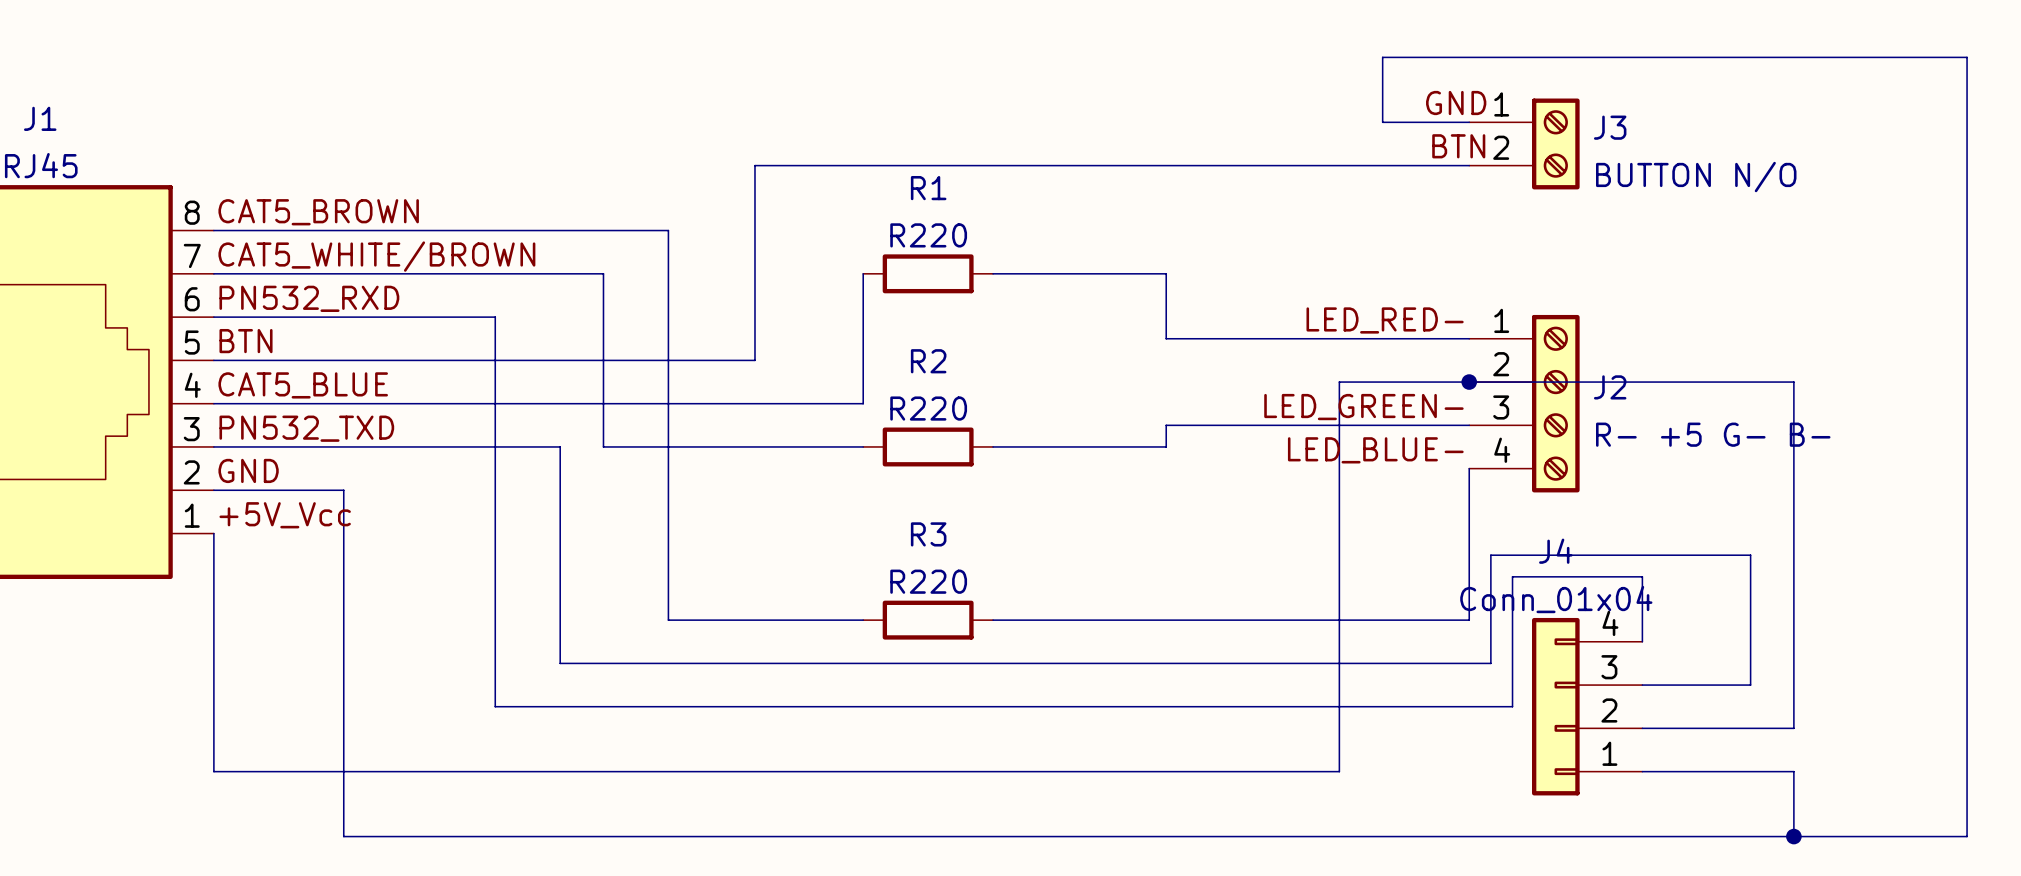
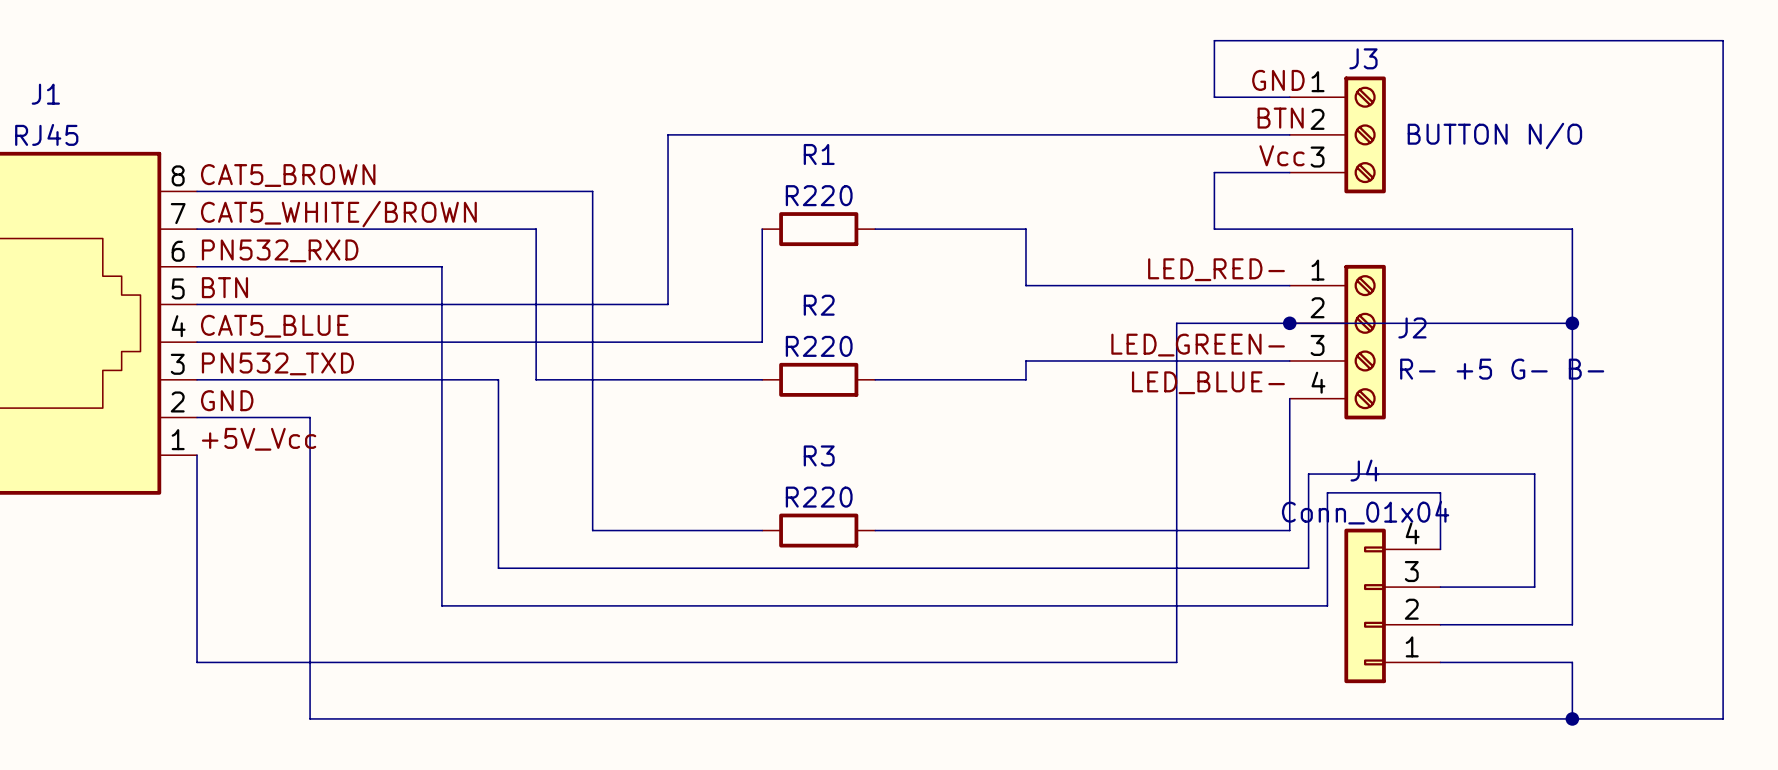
J3 symbol: [1469, 98, 1580, 190] -> [1289, 76, 1386, 194]
J3 name position: J3 (1610, 127) -> J3 (1363, 58)
label: none -> Vcc (1281, 155)
wire: none -> (1289, 172) (1214, 172) (1214, 229) (1572, 229) (1572, 323)
junction: none -> (1572, 323)

